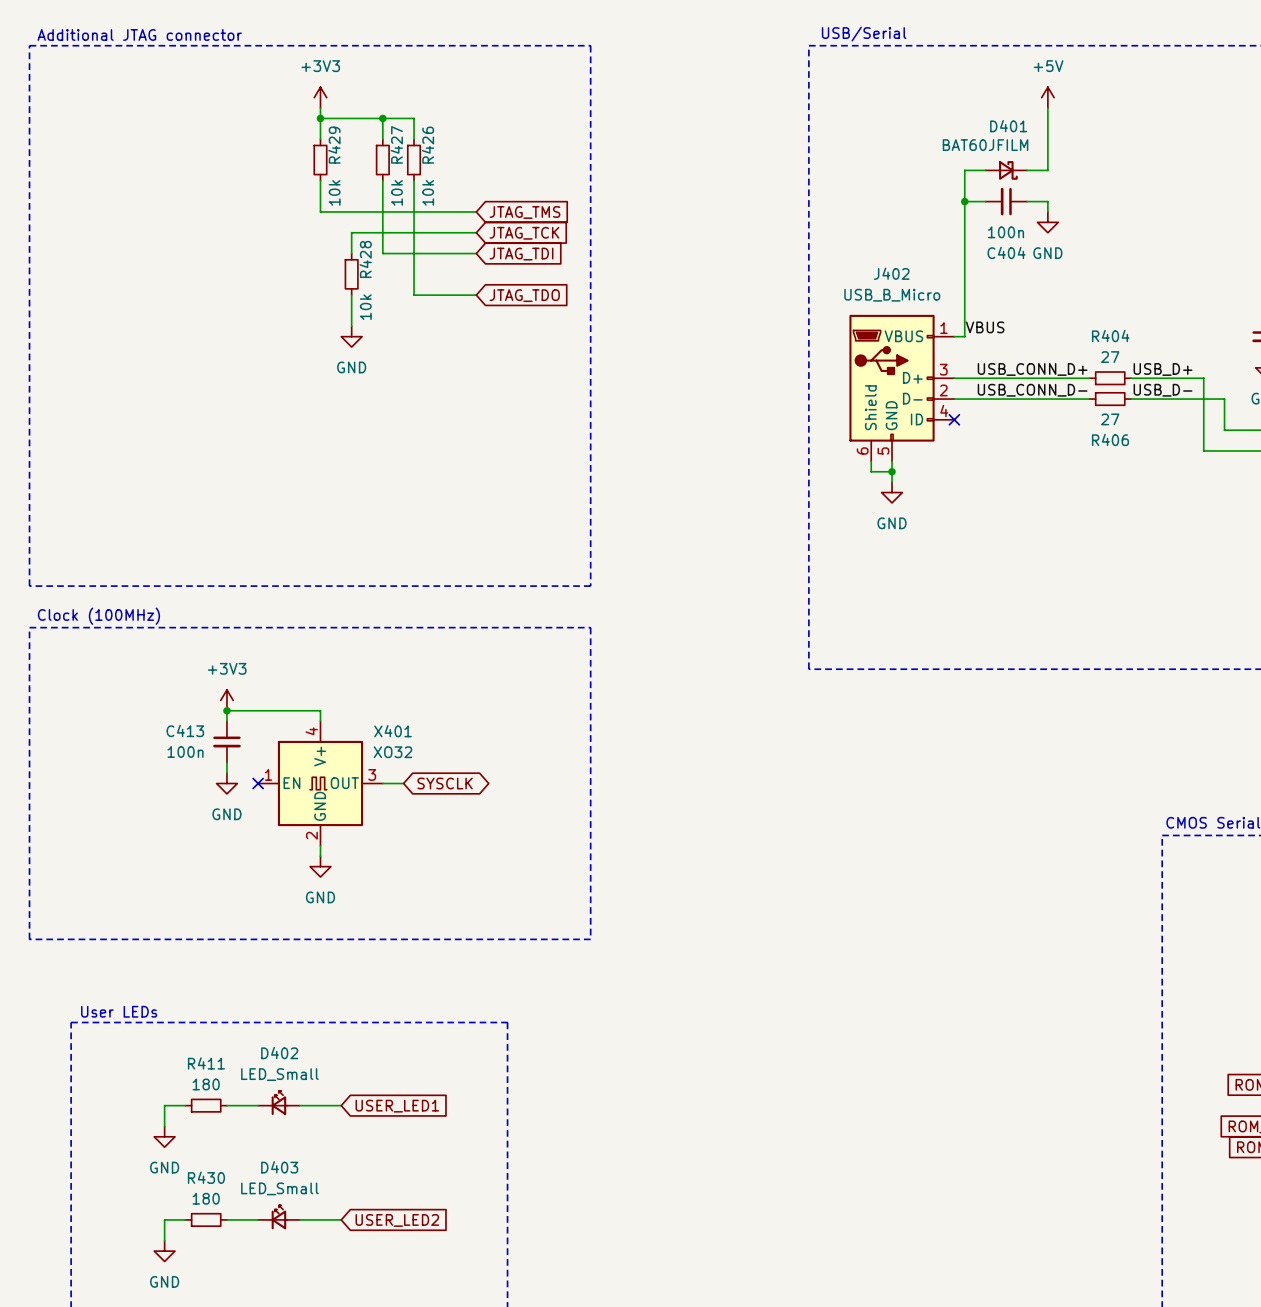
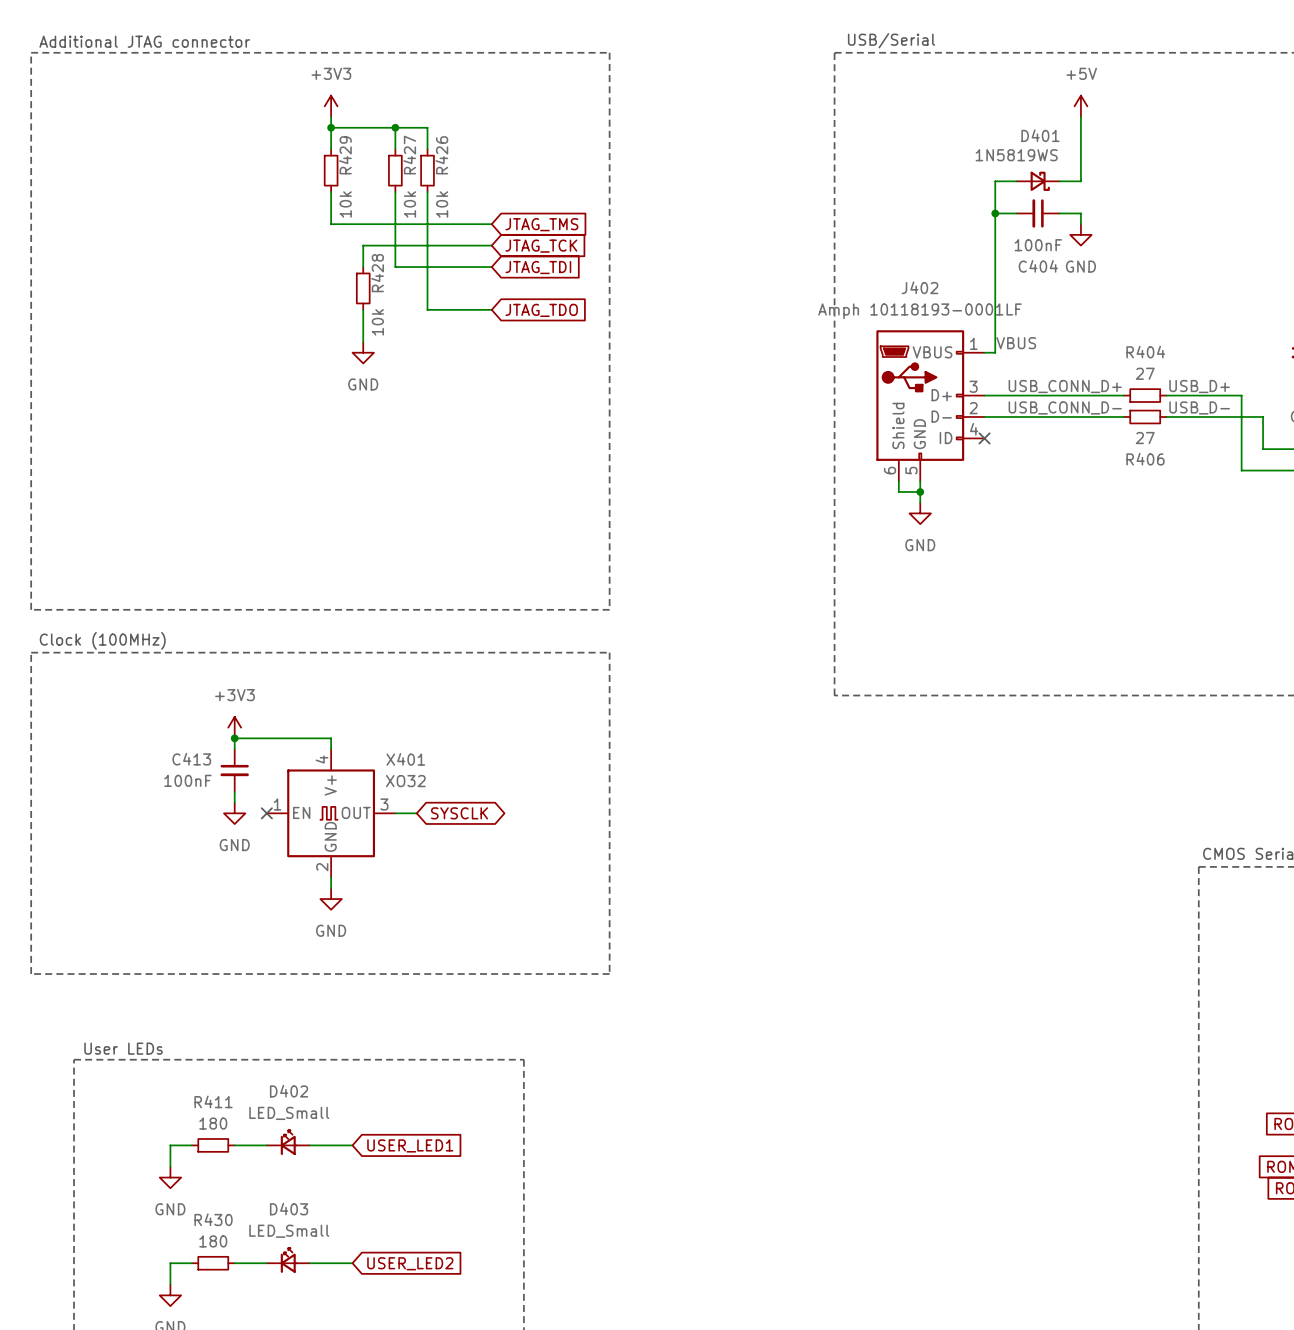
D401 value: BAT60JFILM (985, 145) -> 1N5819WS (1016, 155)
C404 value: 100n (1006, 232) -> 100nF (1038, 245)
J402 value: USB_B_Micro (892, 295) -> Amph 10118193-0001LF (920, 311)
C413 value: 100n (185, 752) -> 100nF (187, 780)

